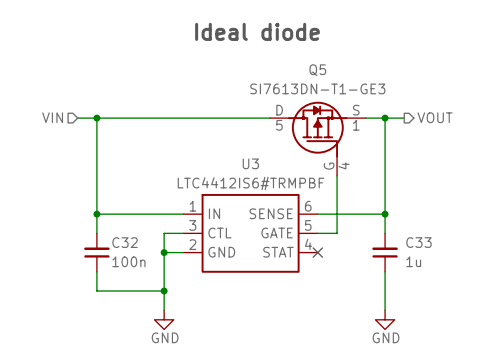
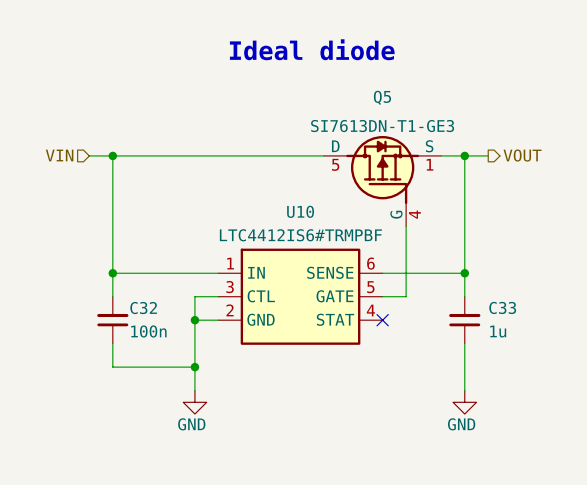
Q5 text: SI7613DN-T1-GE3 (317, 88) -> none
Q5 value: none -> SI7613DN-T1-GE3 (382, 126)
U3 name: U3 (250, 163) -> U10 (300, 211)

